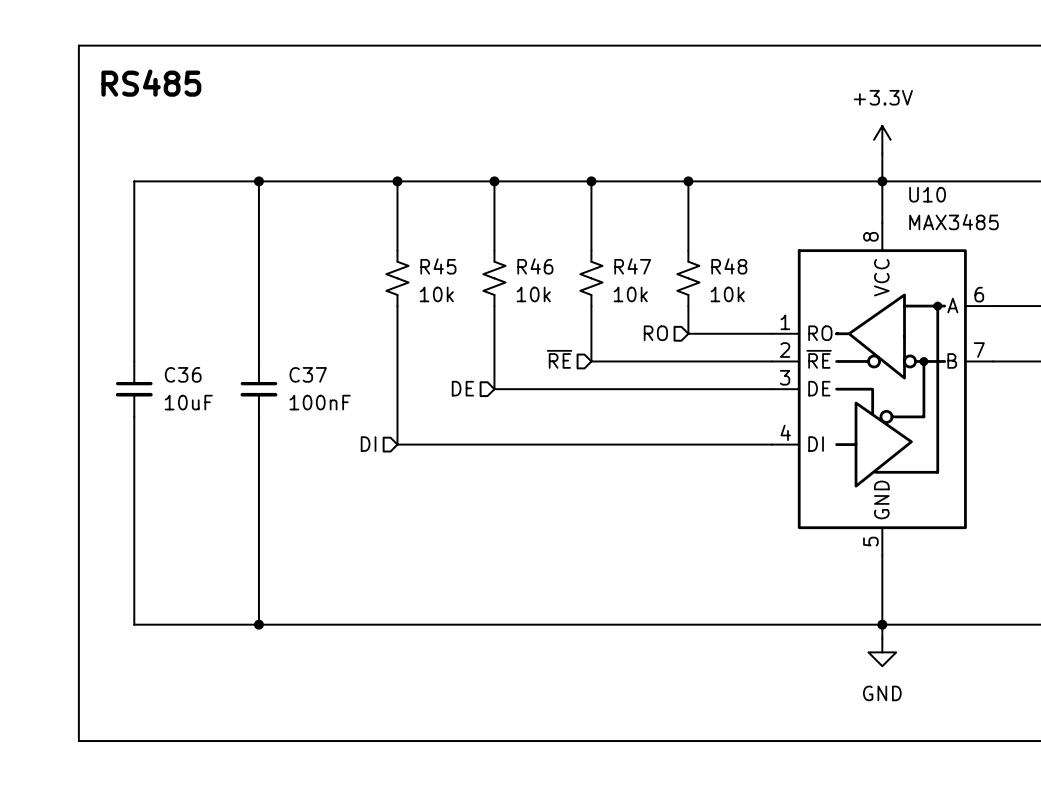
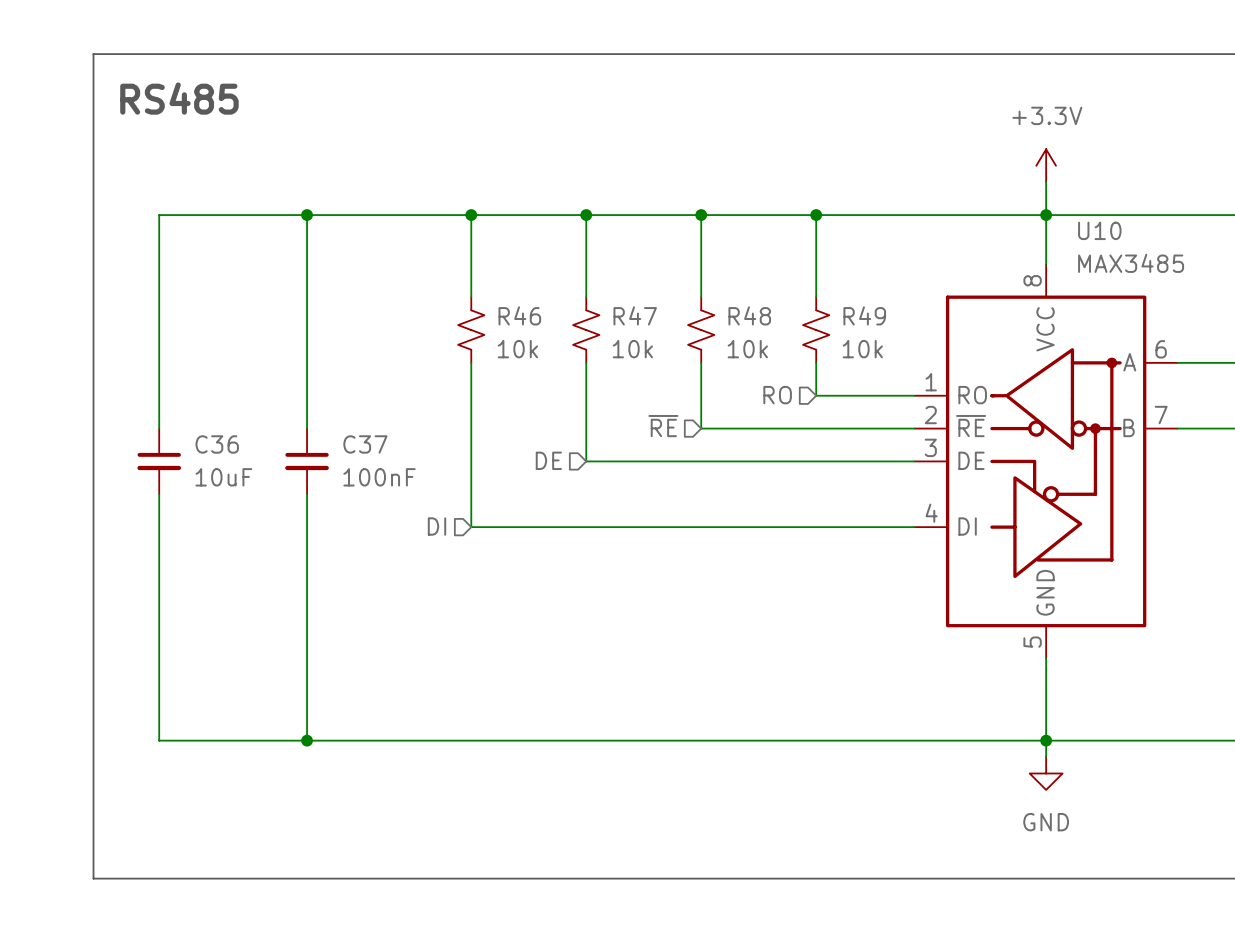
R45 name: R45 (438, 266) -> R46 (519, 315)
R46 name: R46 (535, 266) -> R47 (635, 315)
R47 name: R47 (632, 266) -> R48 (749, 315)
R48 name: R48 (729, 266) -> R49 (864, 315)

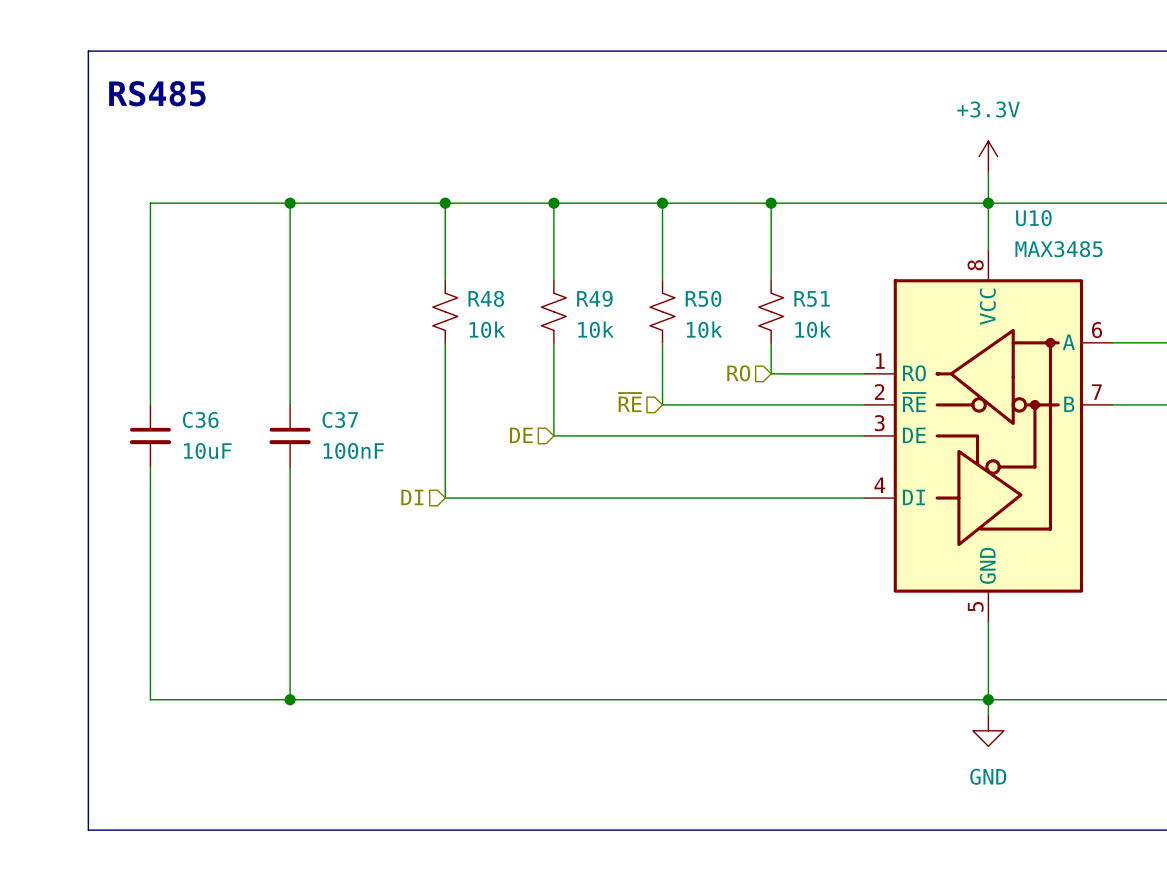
R46 name: R46 (519, 315) -> R48 (486, 298)
R47 name: R47 (635, 315) -> R49 (594, 298)
R48 name: R48 (749, 315) -> R50 (703, 298)
R49 name: R49 (864, 315) -> R51 (812, 298)

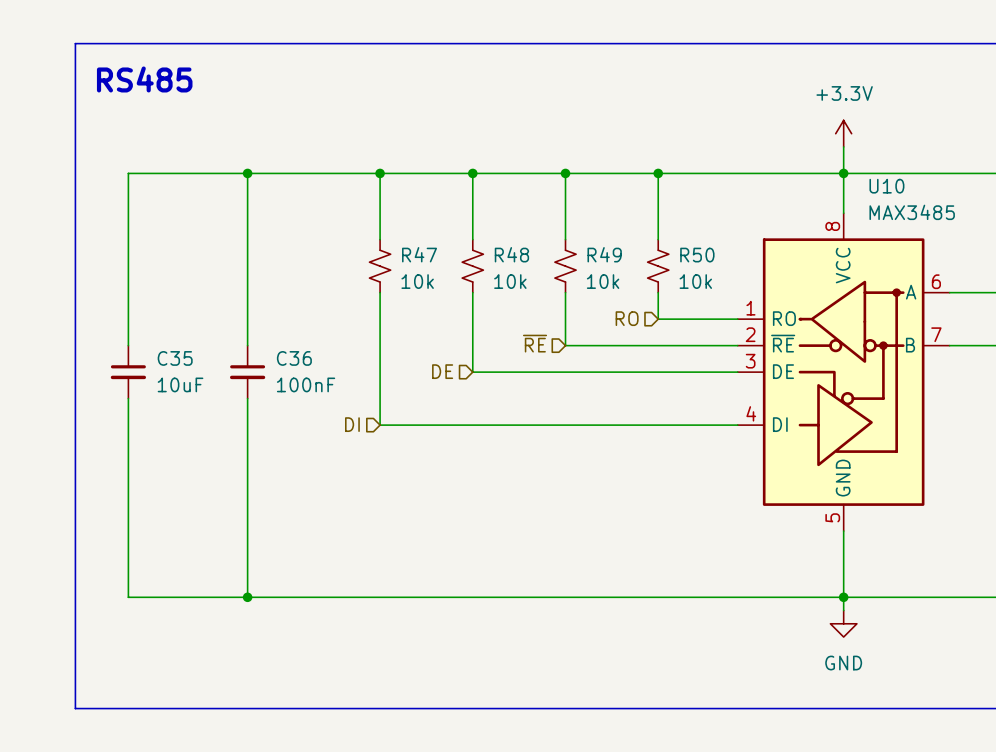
R48 name: R48 (486, 298) -> R47 (419, 254)
R49 name: R49 (594, 298) -> R48 (511, 254)
R50 name: R50 (703, 298) -> R49 (604, 254)
R51 name: R51 (812, 298) -> R50 (697, 255)
C36 name: C36 (200, 419) -> C35 (175, 358)
C37 name: C37 (340, 419) -> C36 (294, 358)

